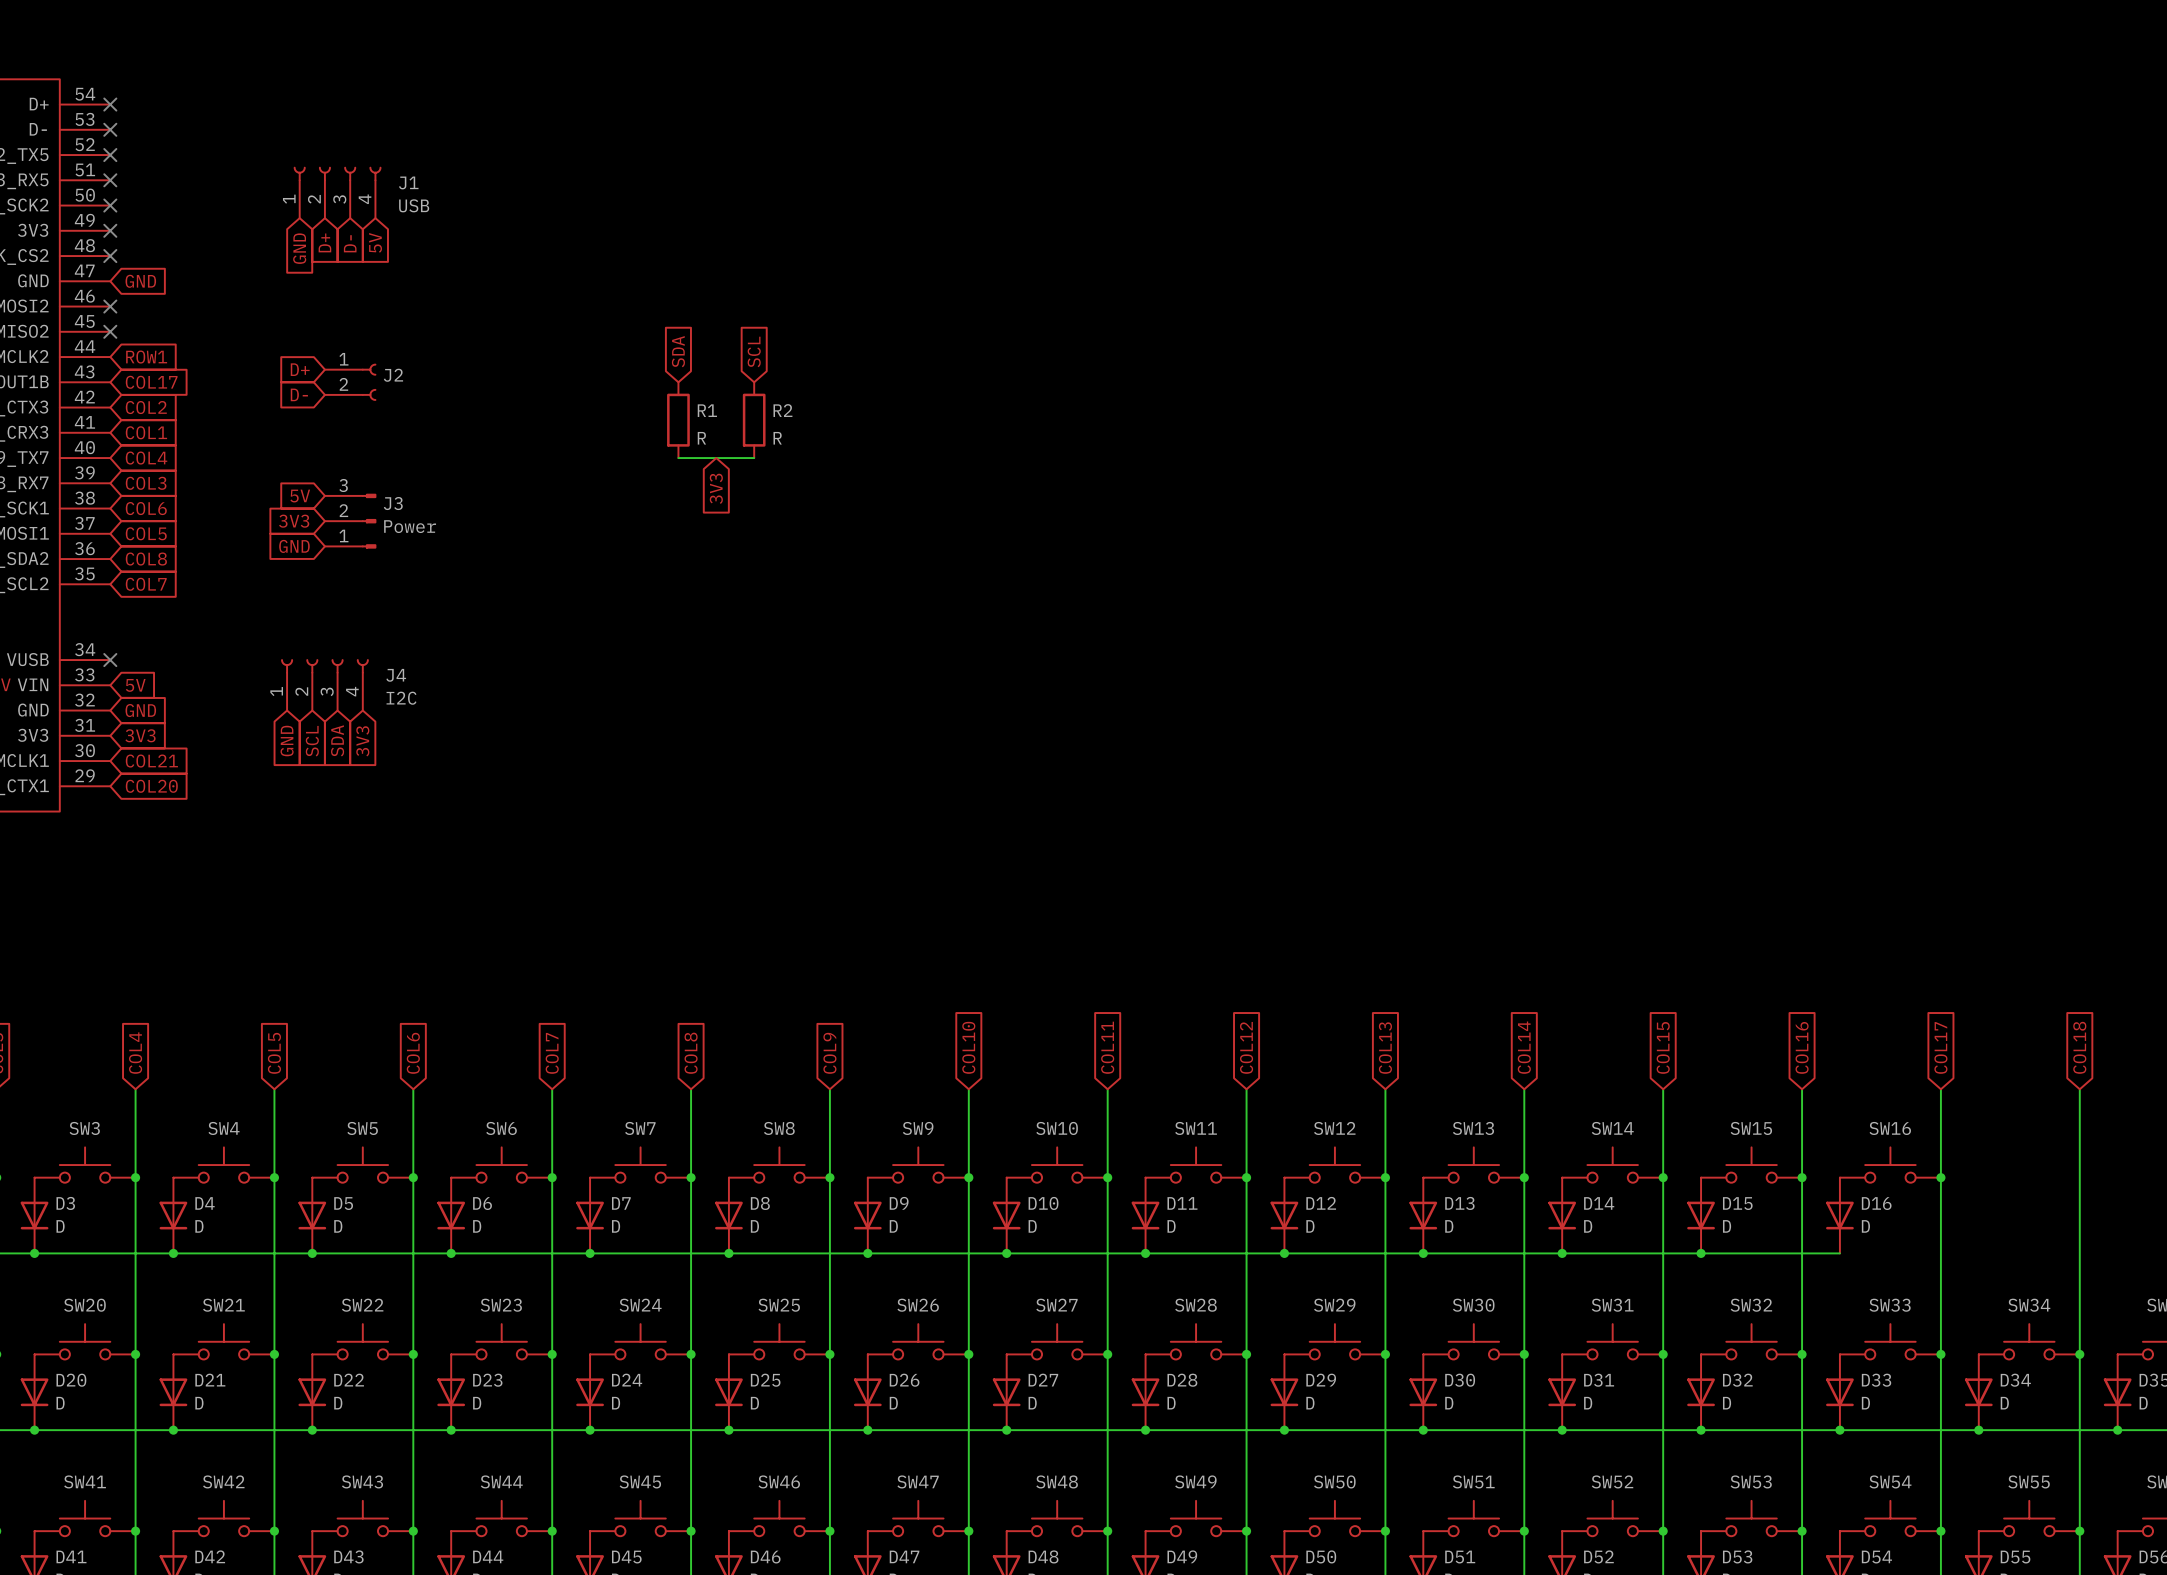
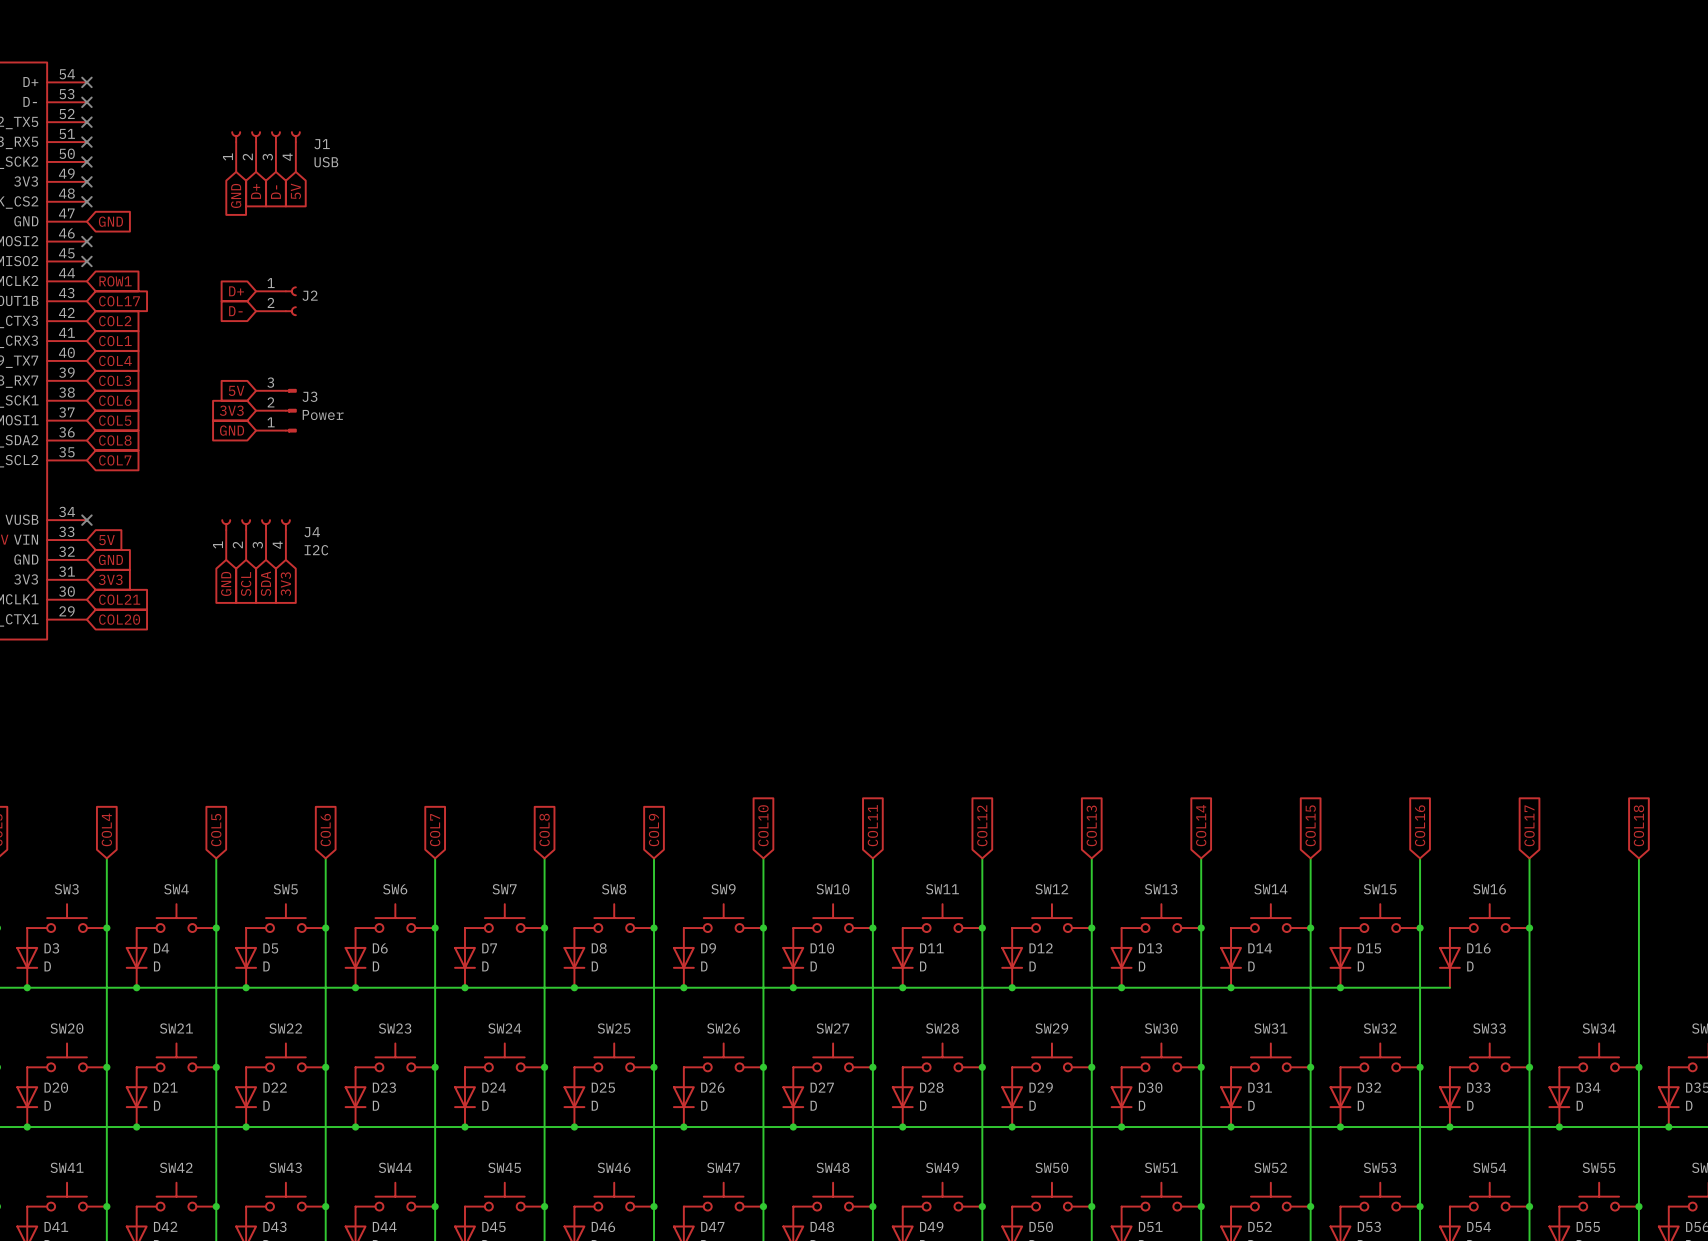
global label: SDA (678, 351) -> none
global label: SCL (754, 351) -> none
R1: R (678, 420) -> none
R2: R (754, 420) -> none
wire: (678, 458) (754, 458) -> none
global label: 3V3 (716, 488) -> none

